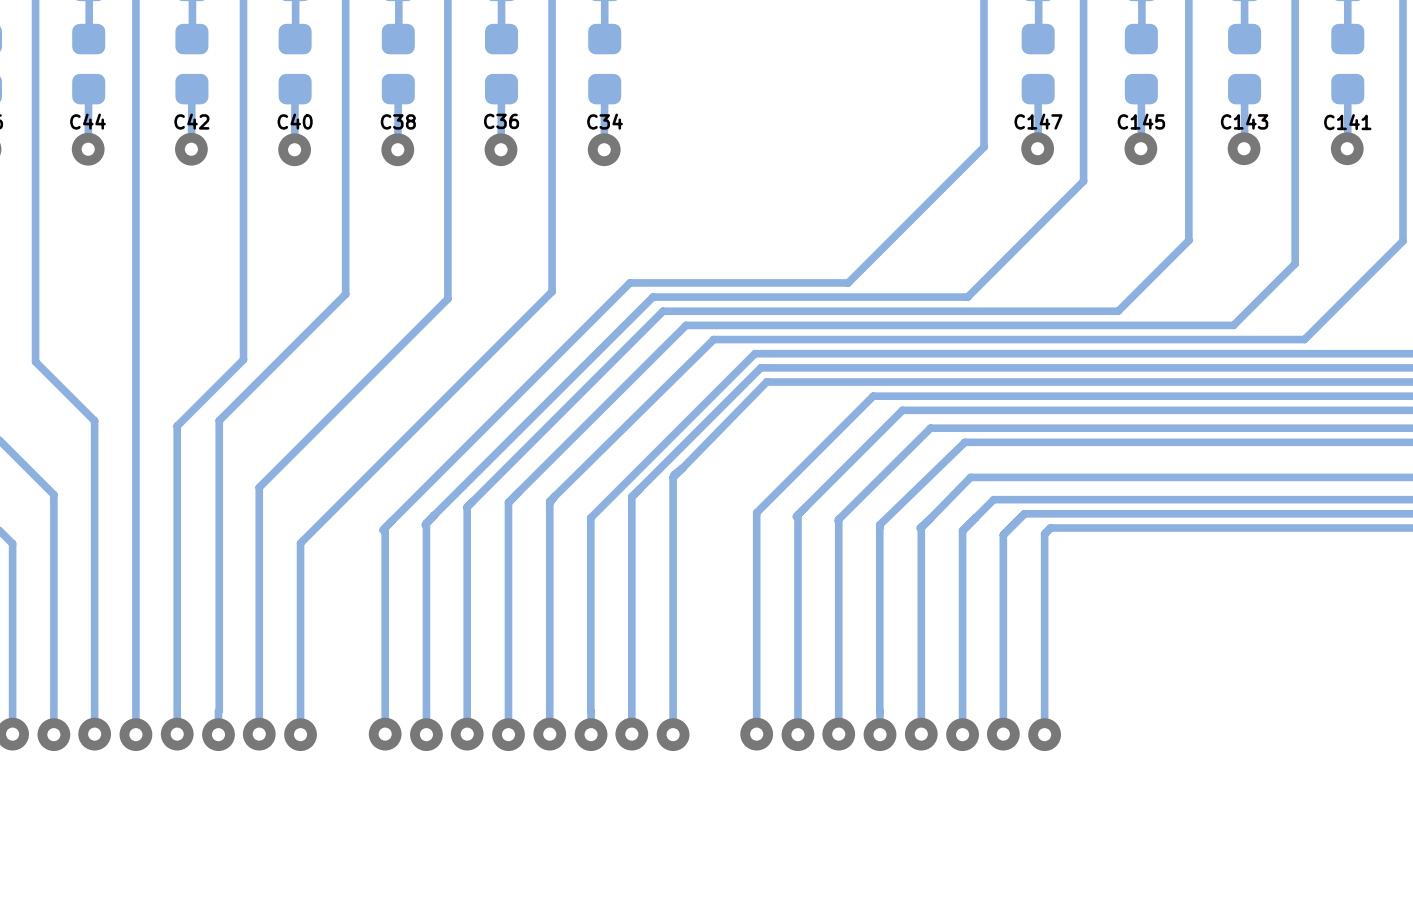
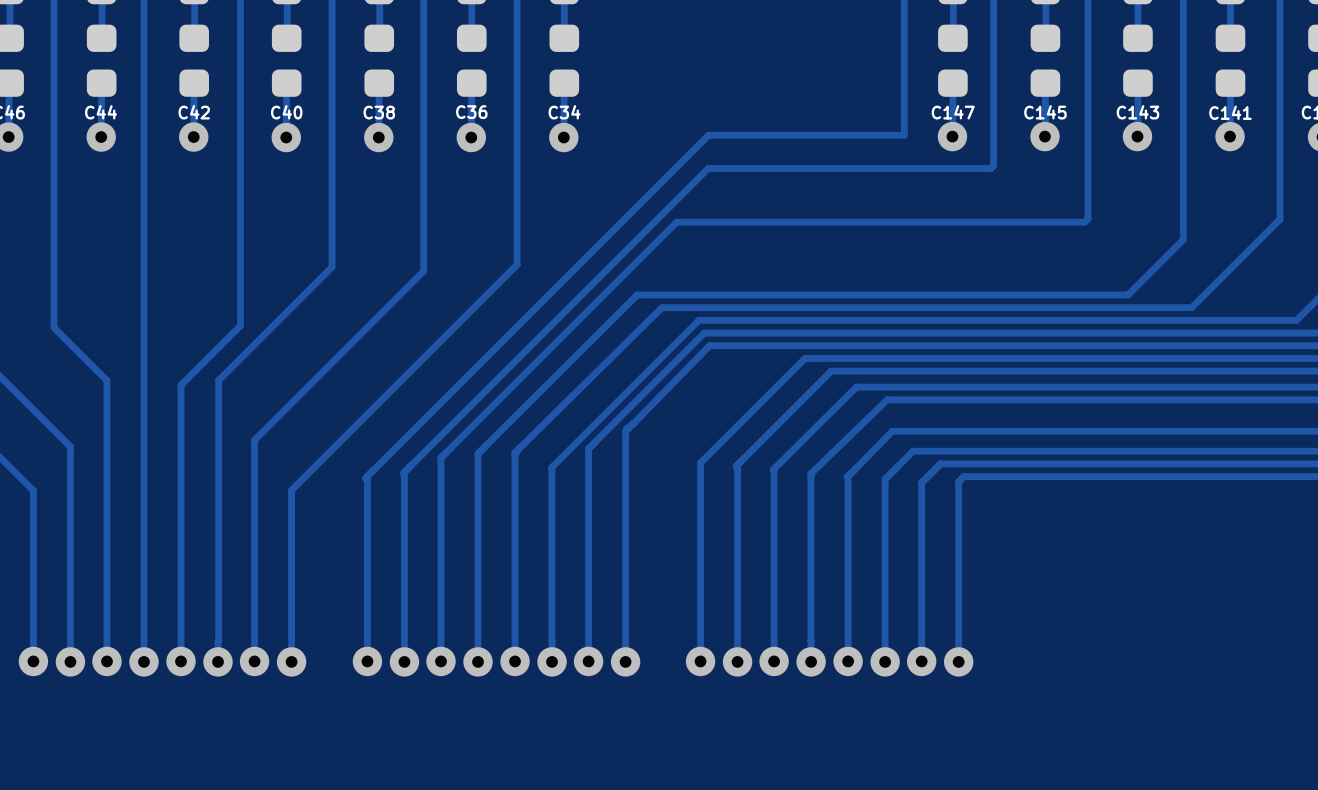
track: (983, 147) (848, 282) (629, 282) -> (904, 135) (708, 135) (586, 256)
track: (1080, 184) (967, 297) (652, 297) (434, 515) -> (990, 168) (708, 168) (411, 465)
track: (1185, 244) (1118, 311) (663, 311) -> (1084, 222) (676, 222) (616, 282)

